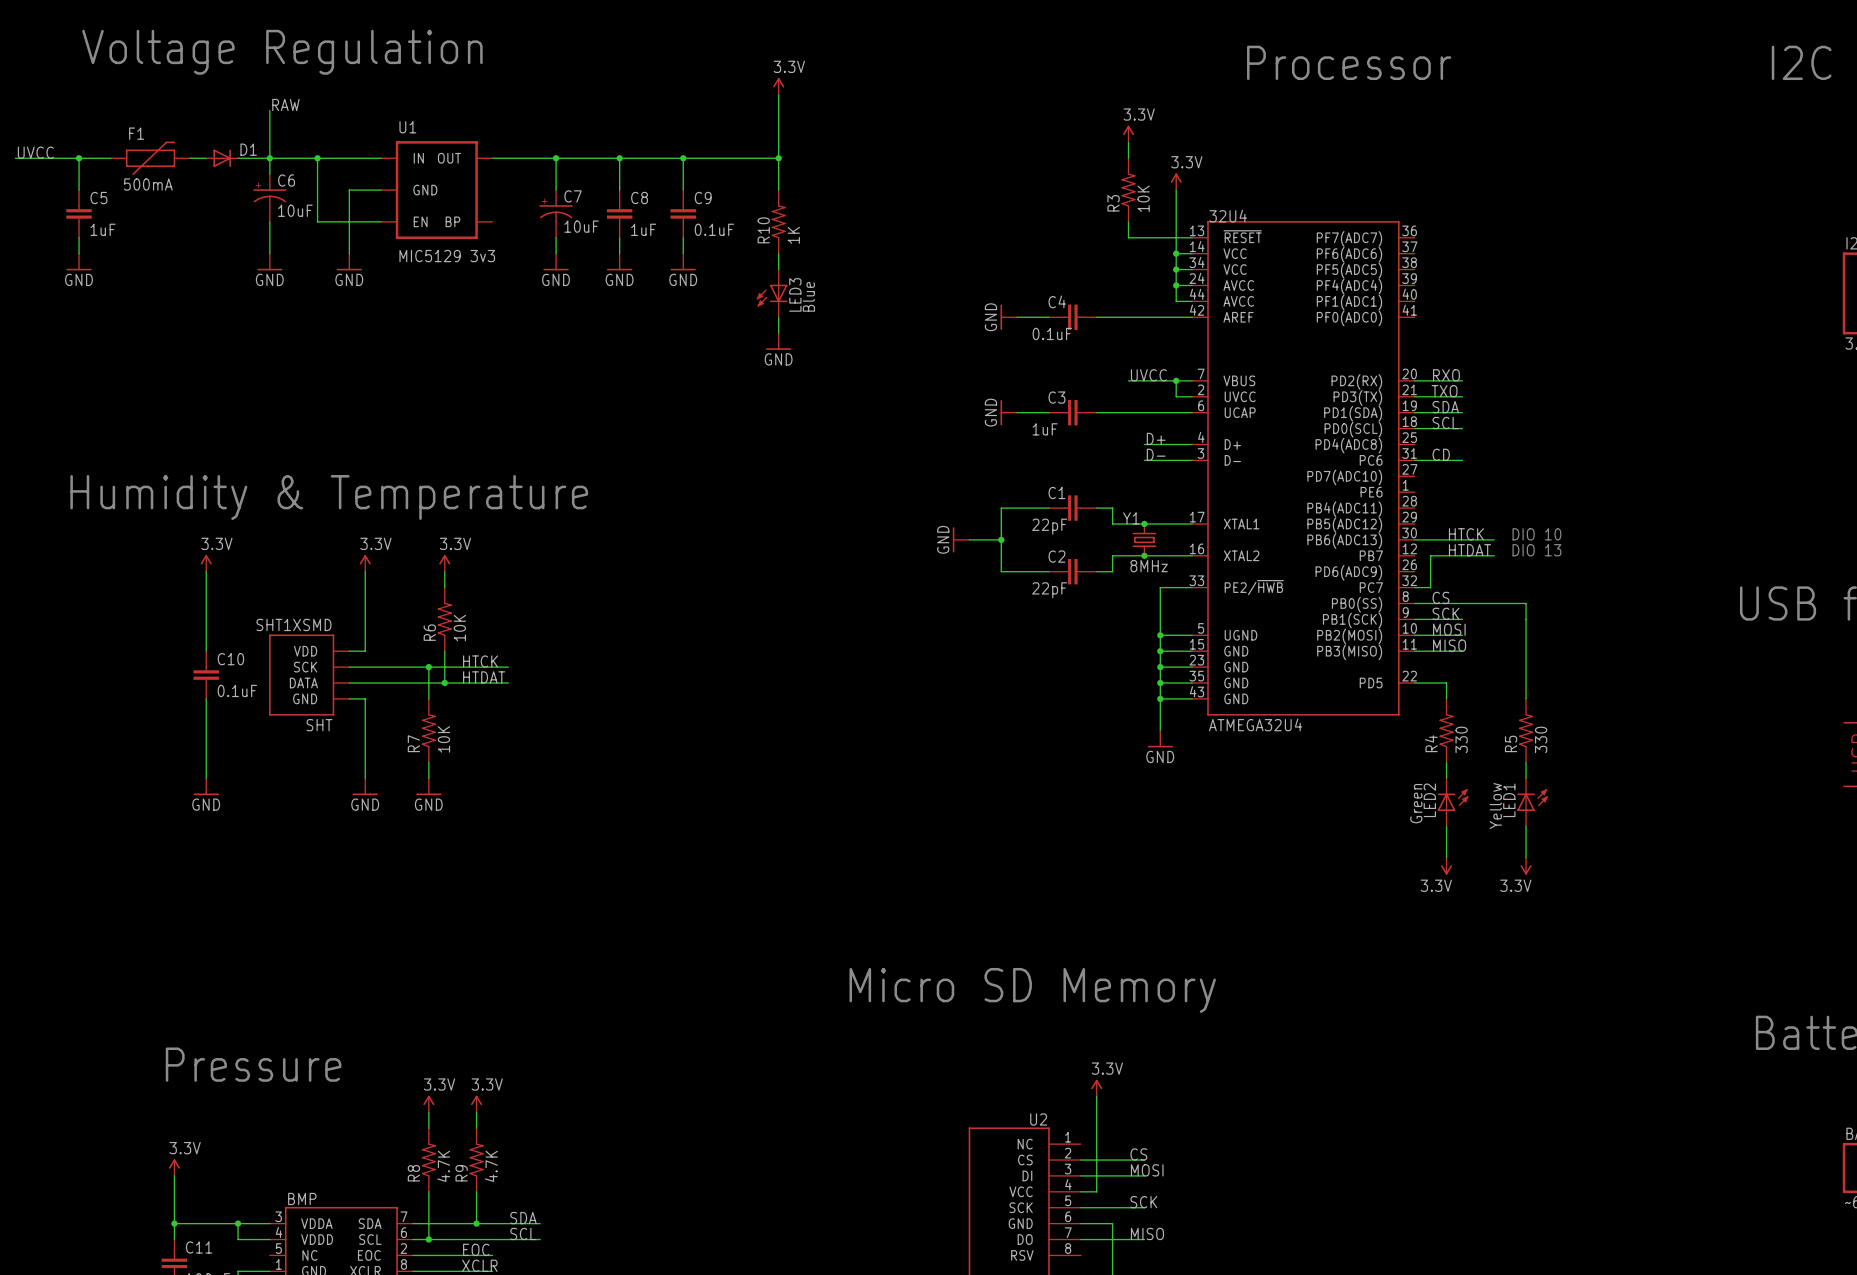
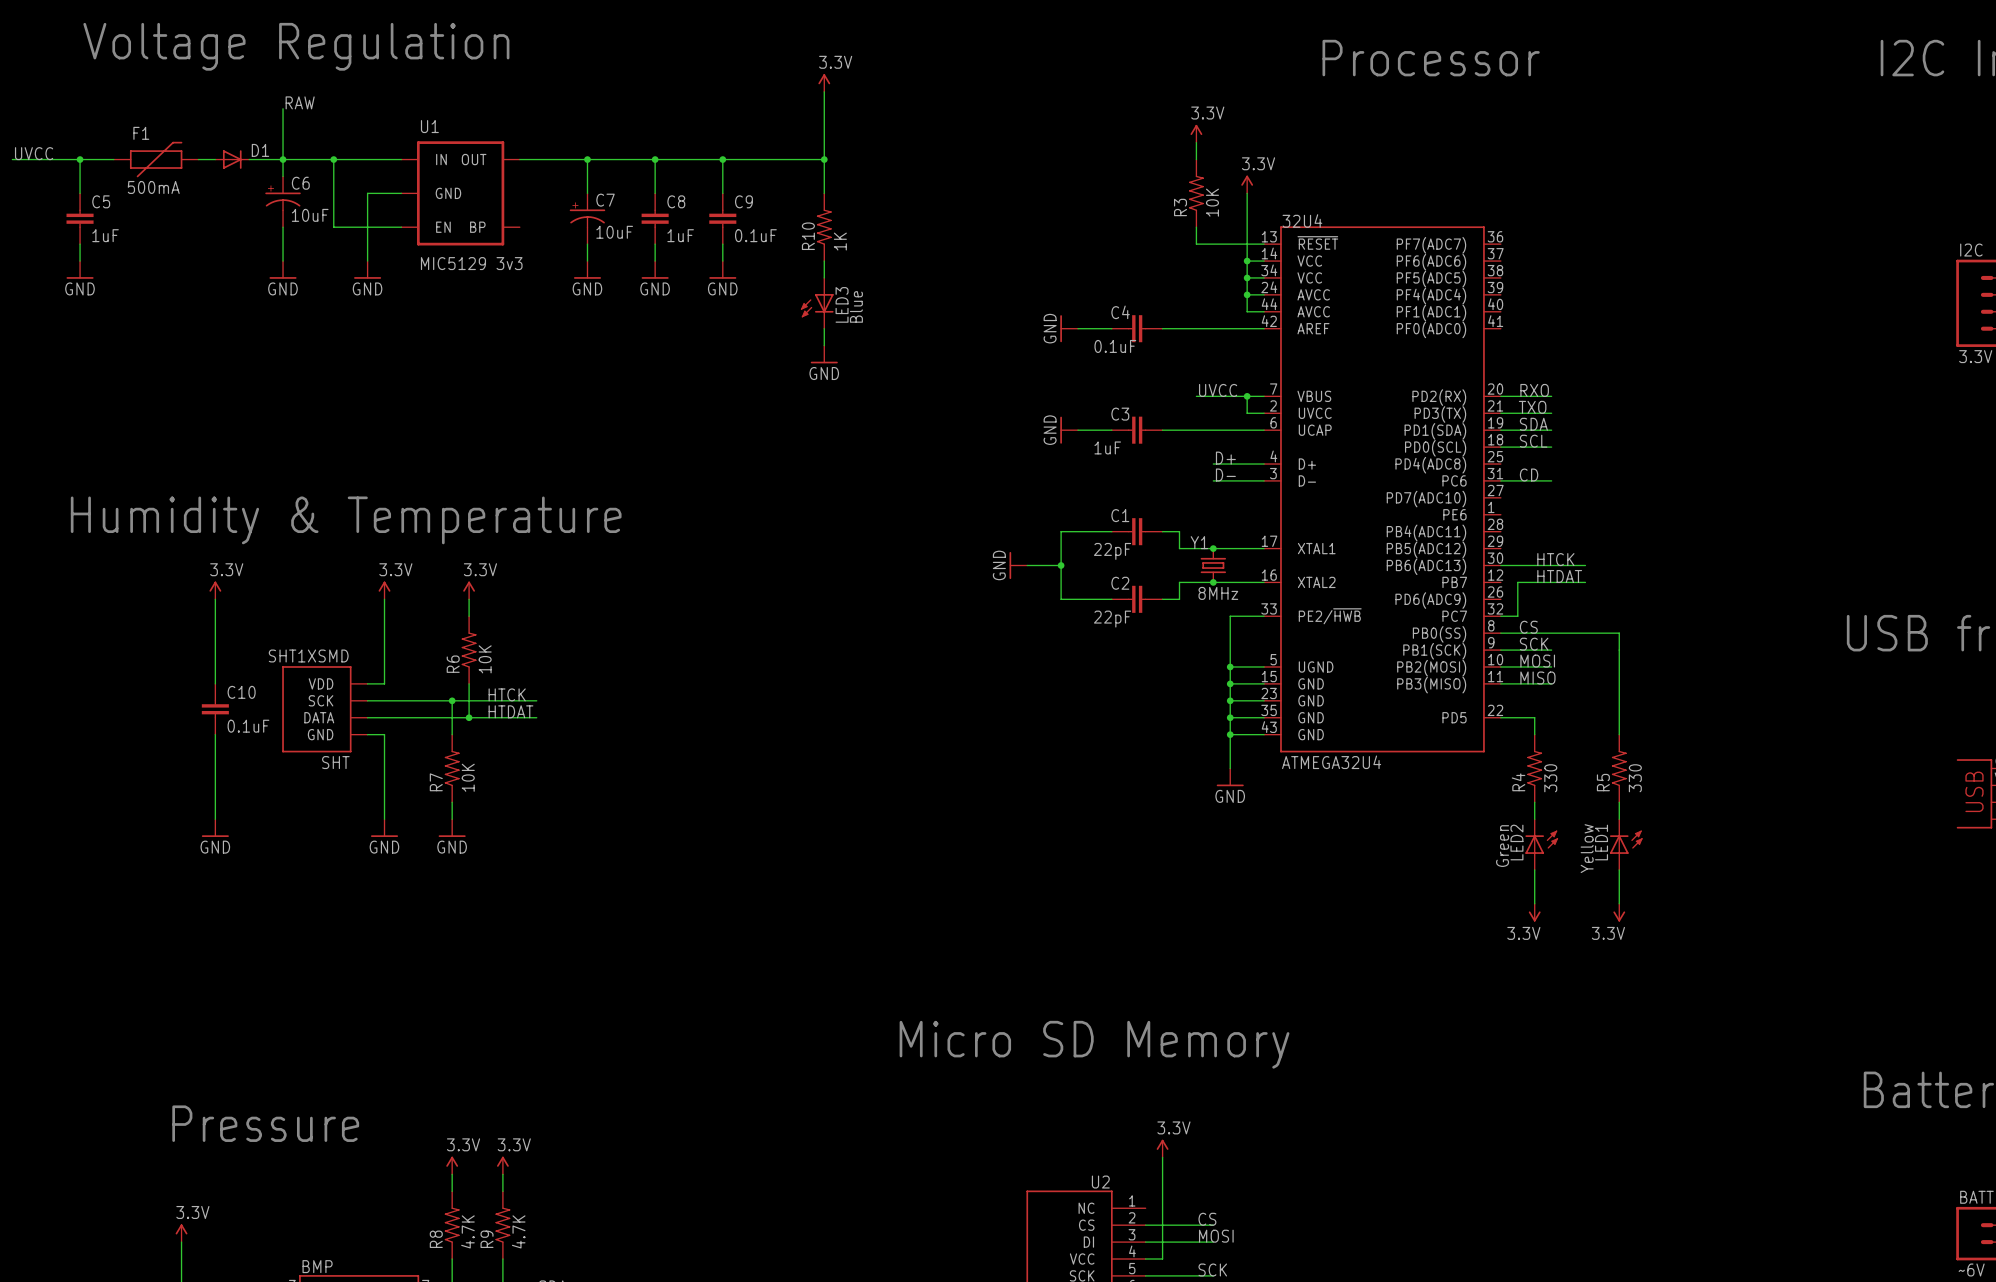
text: DIO 10 (1536, 534) -> none
text: DIO 13 (1536, 550) -> none

